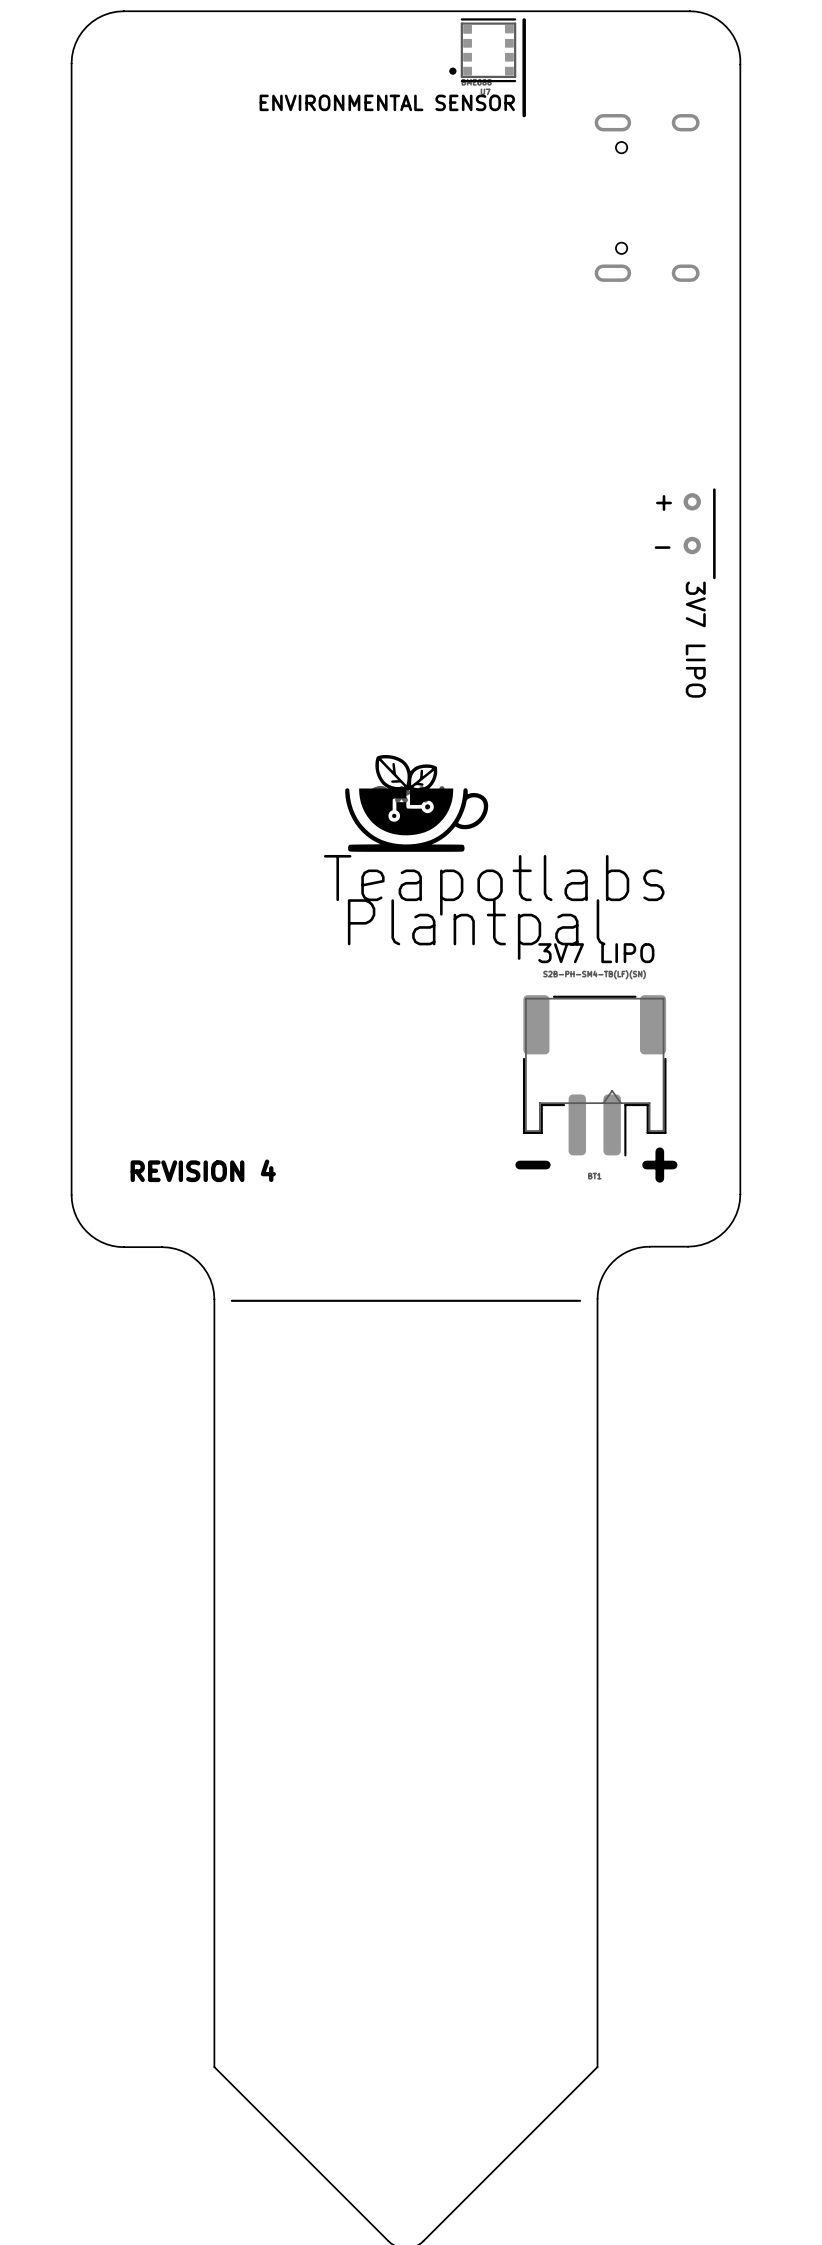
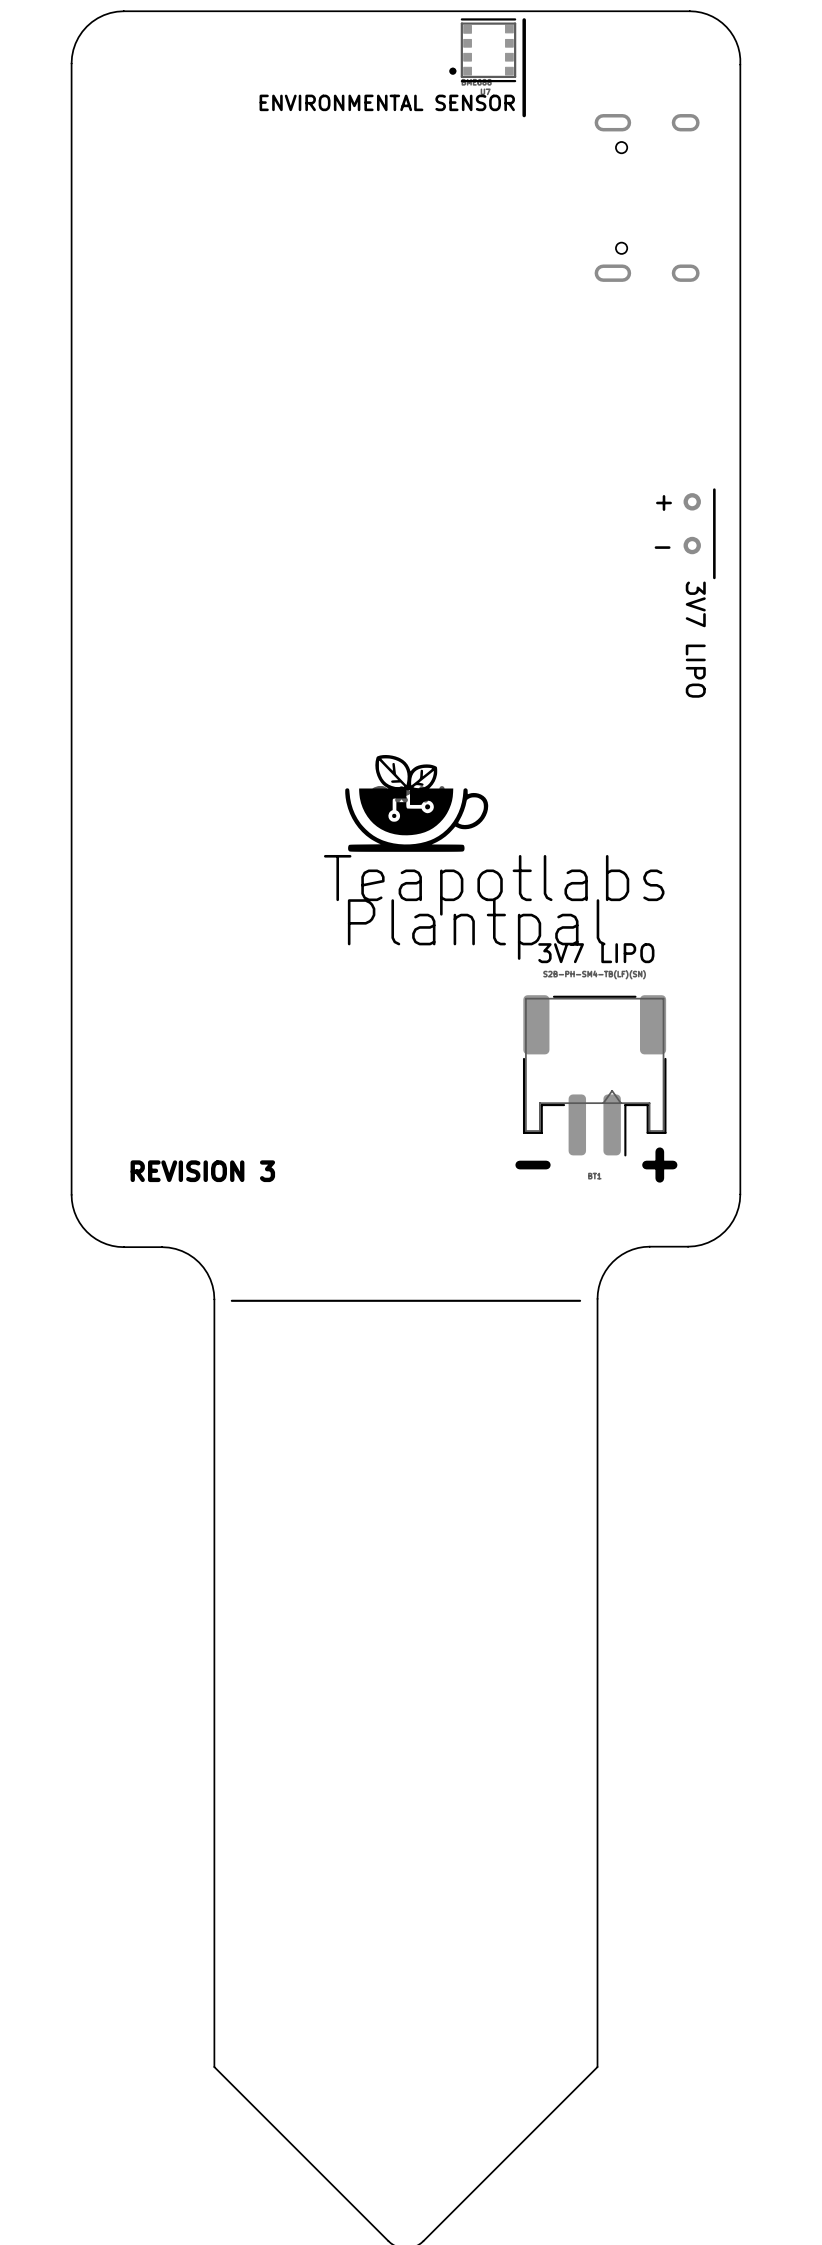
text: REVISION 4 (203, 1170) -> REVISION 3 (202, 1171)

